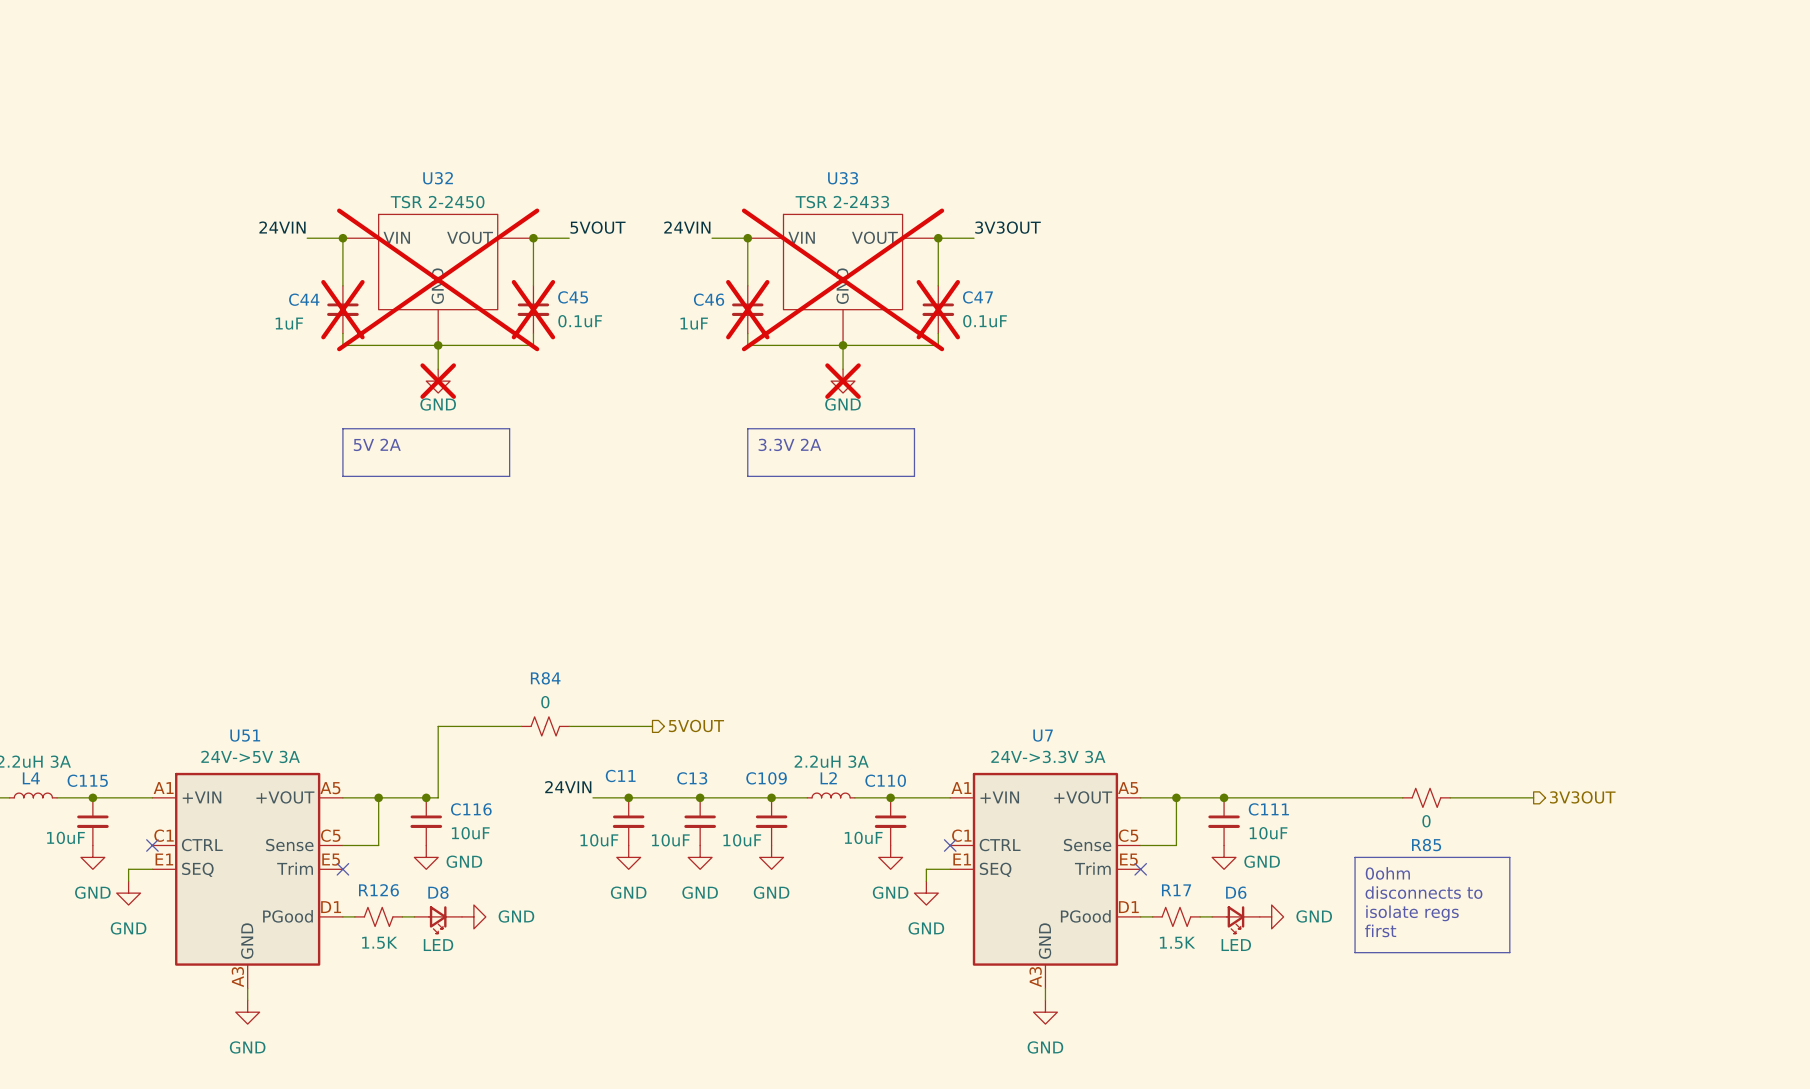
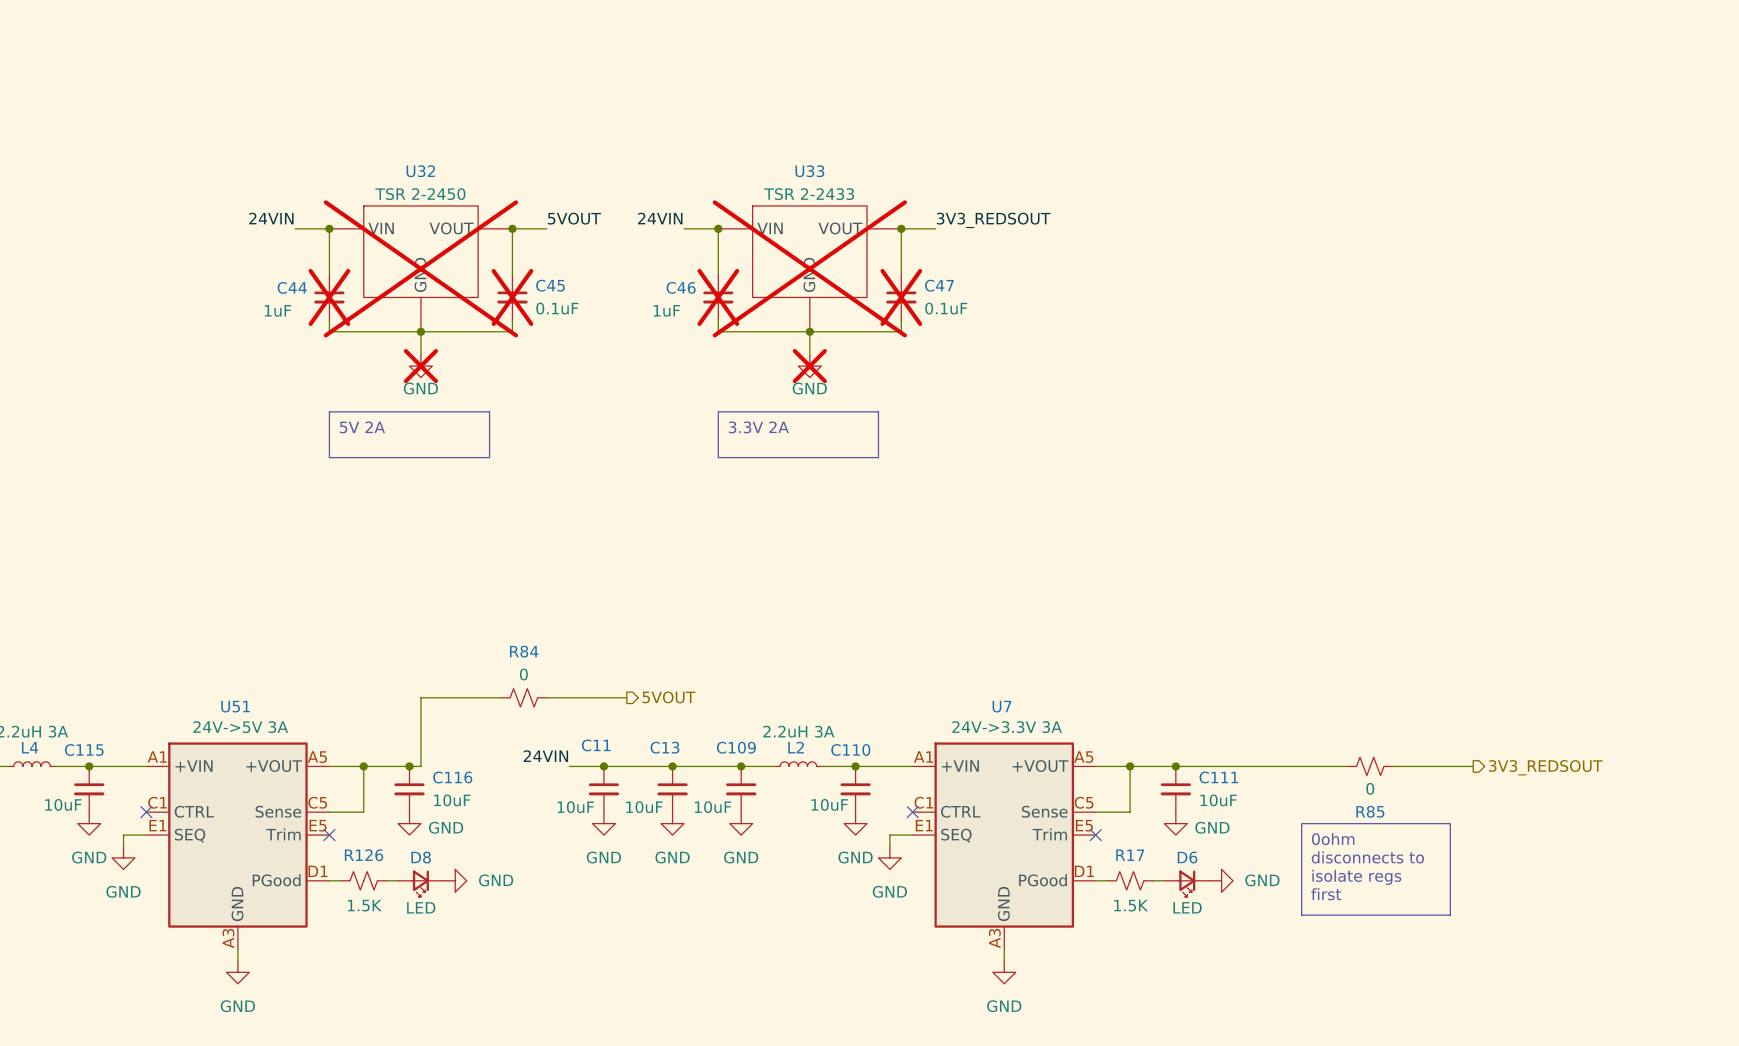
label: 3V3OUT (1008, 227) -> 3V3_REDSOUT (993, 220)
hierarchical label: 3V3OUT (1582, 797) -> 3V3_REDSOUT (1545, 767)

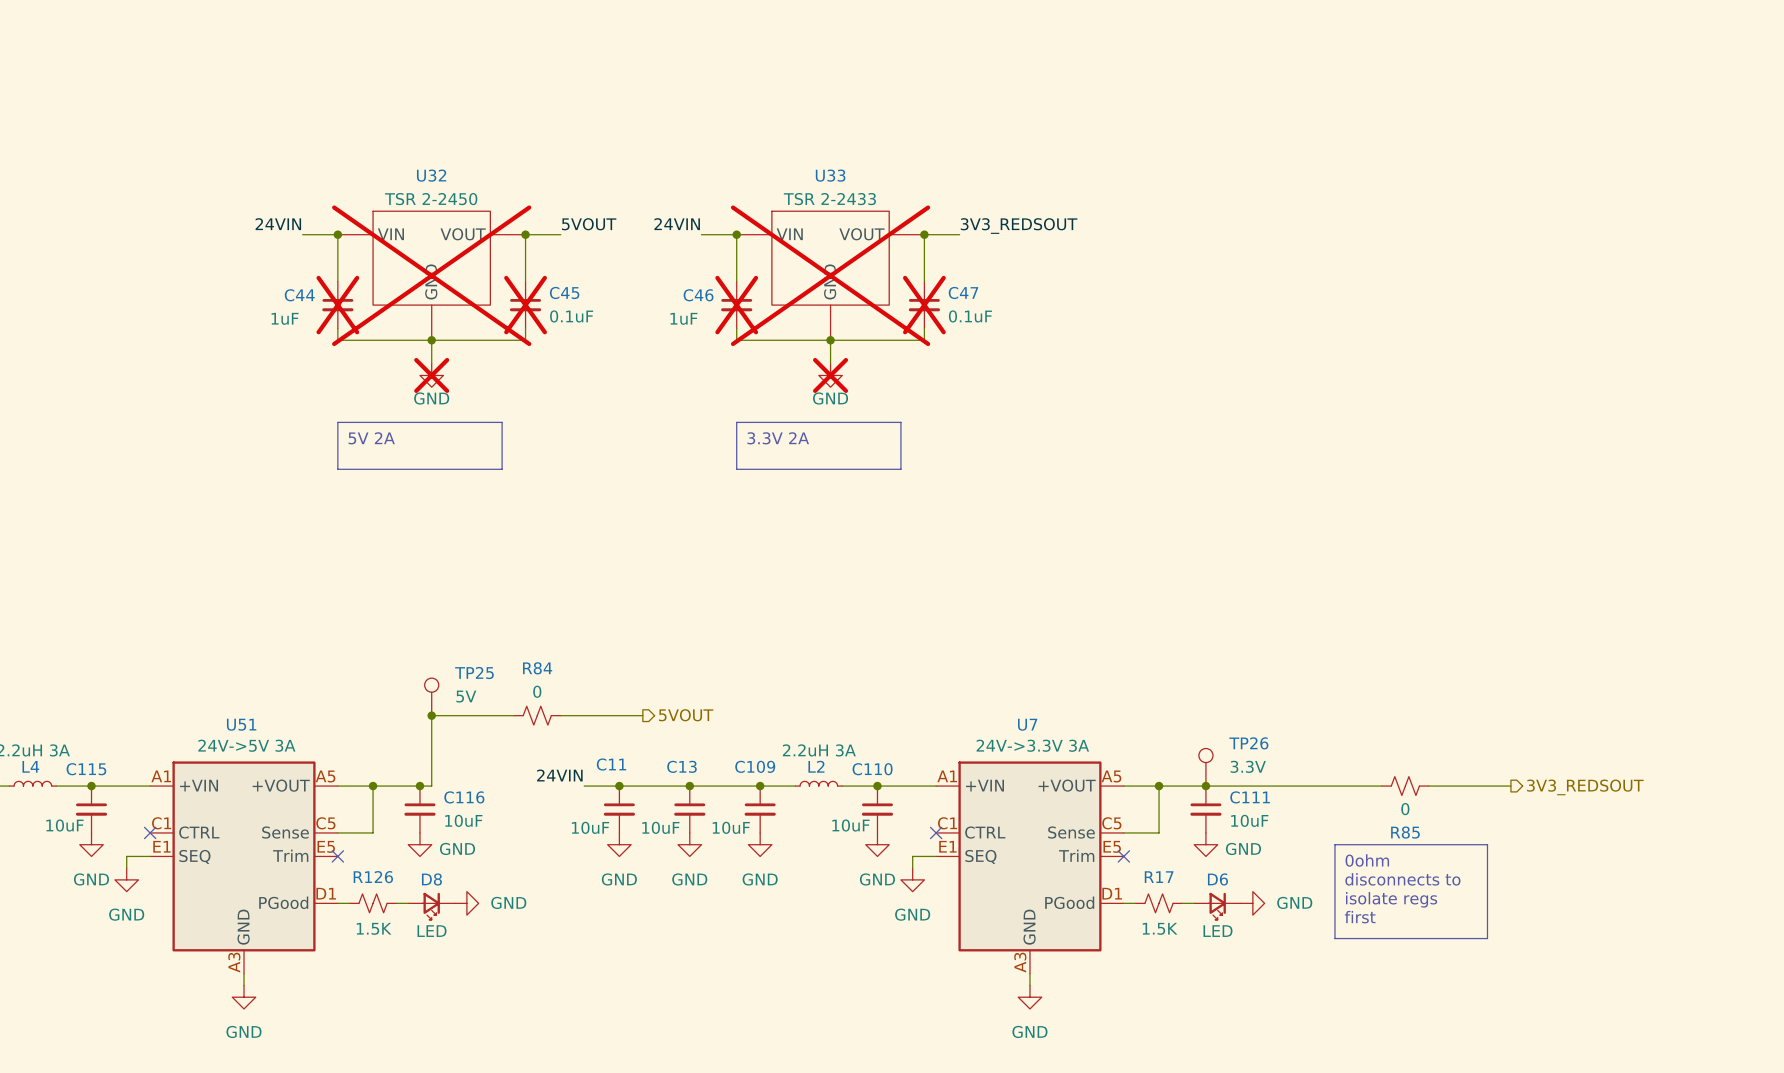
TP25: none -> 5V (431, 696)
junction: none -> (431, 715)
TP26: none -> 3.3V (1205, 767)

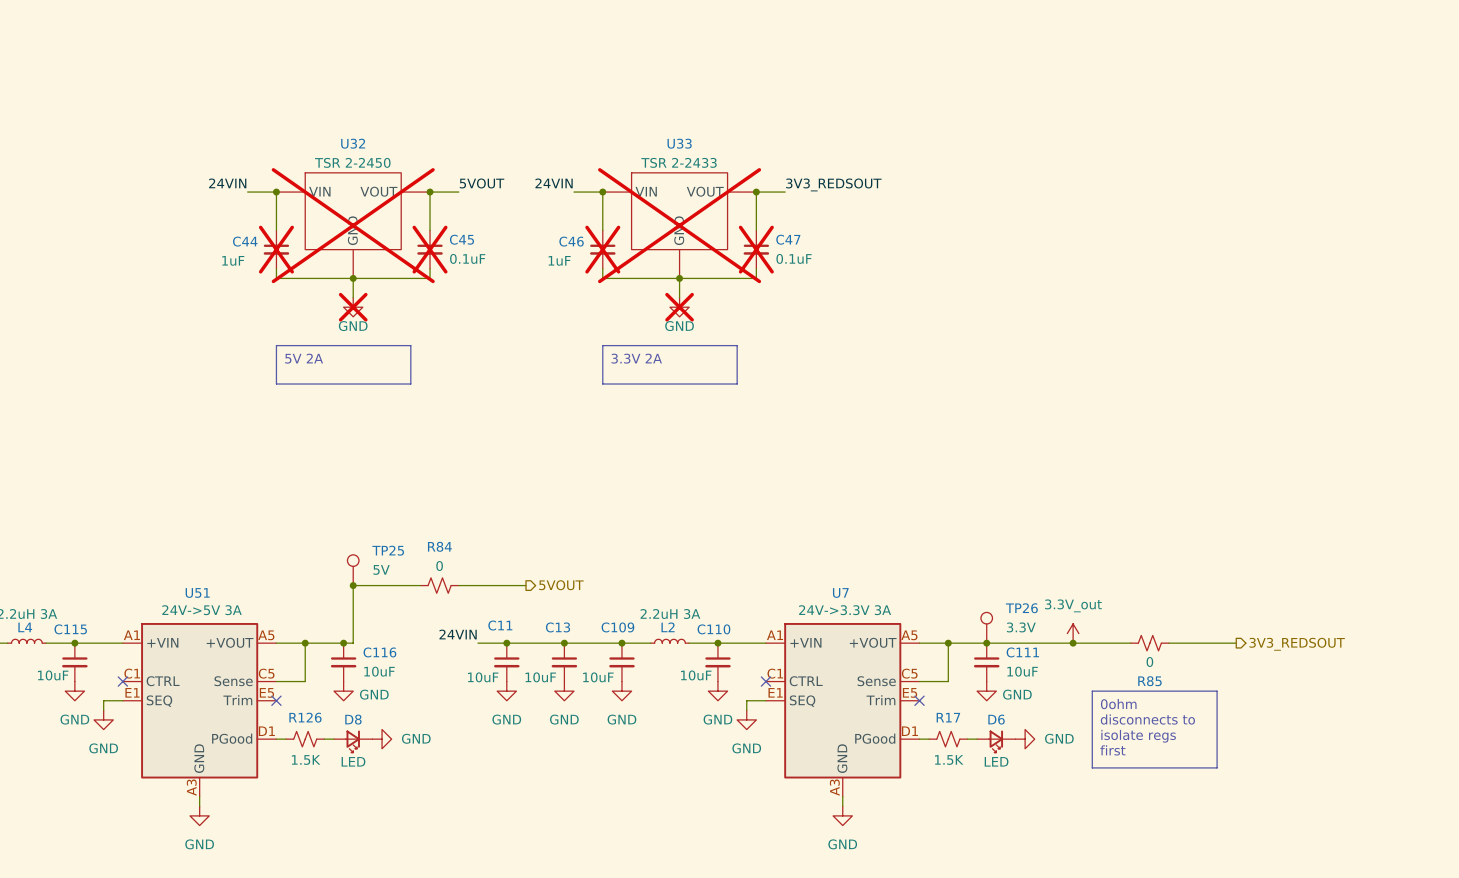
power symbol: none -> 3.3V_out (1073, 633)
junction: none -> (1073, 643)

